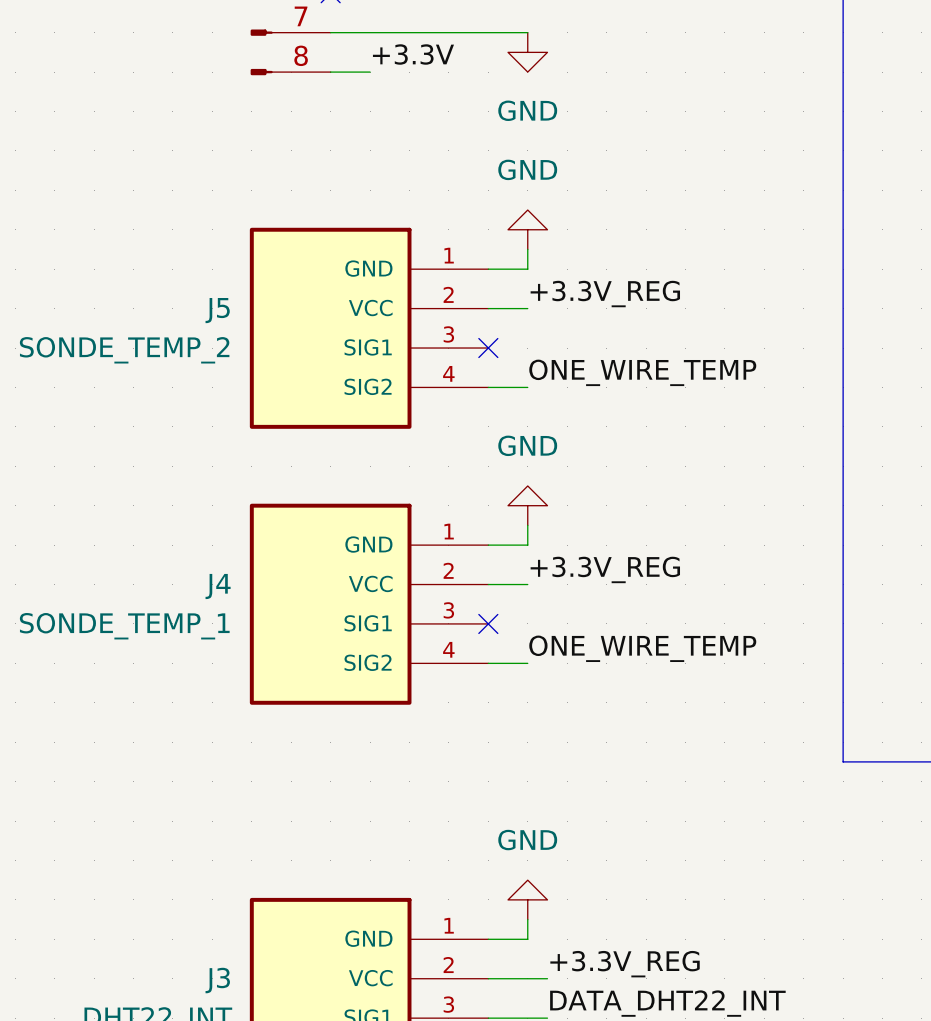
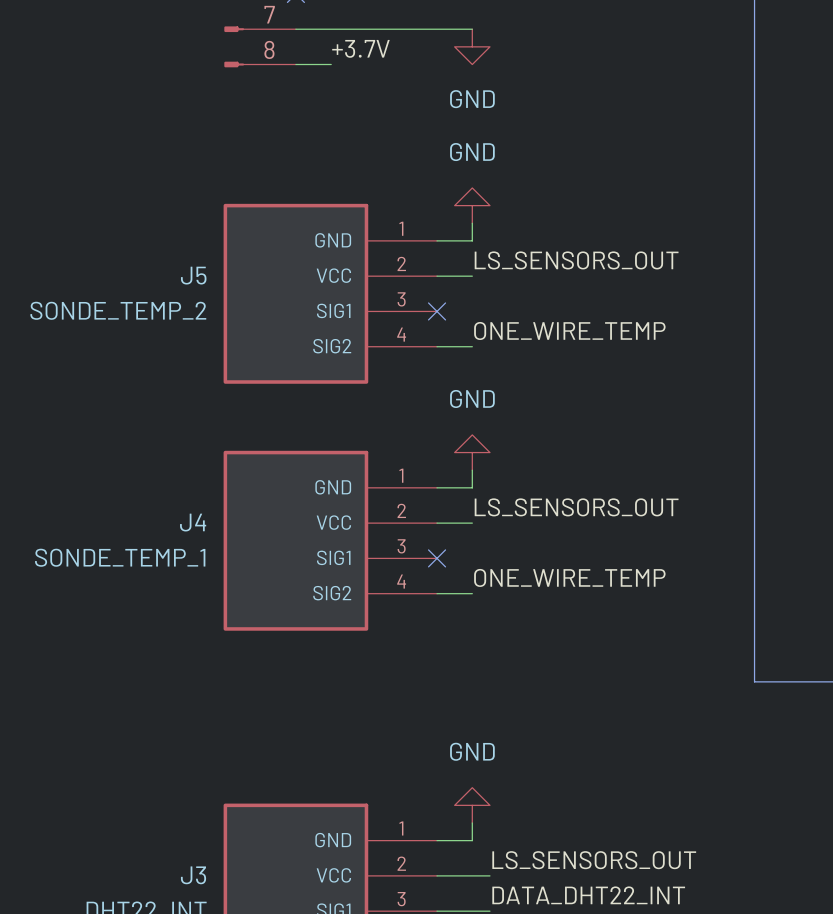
label: +3.3V (413, 54) -> +3.7V (360, 48)
label: +3.3V_REG (605, 294) -> LS_SENSORS_OUT (576, 260)
label: +3.3V_REG (605, 569) -> LS_SENSORS_OUT (576, 507)
label: +3.3V_REG (625, 964) -> LS_SENSORS_OUT (594, 860)

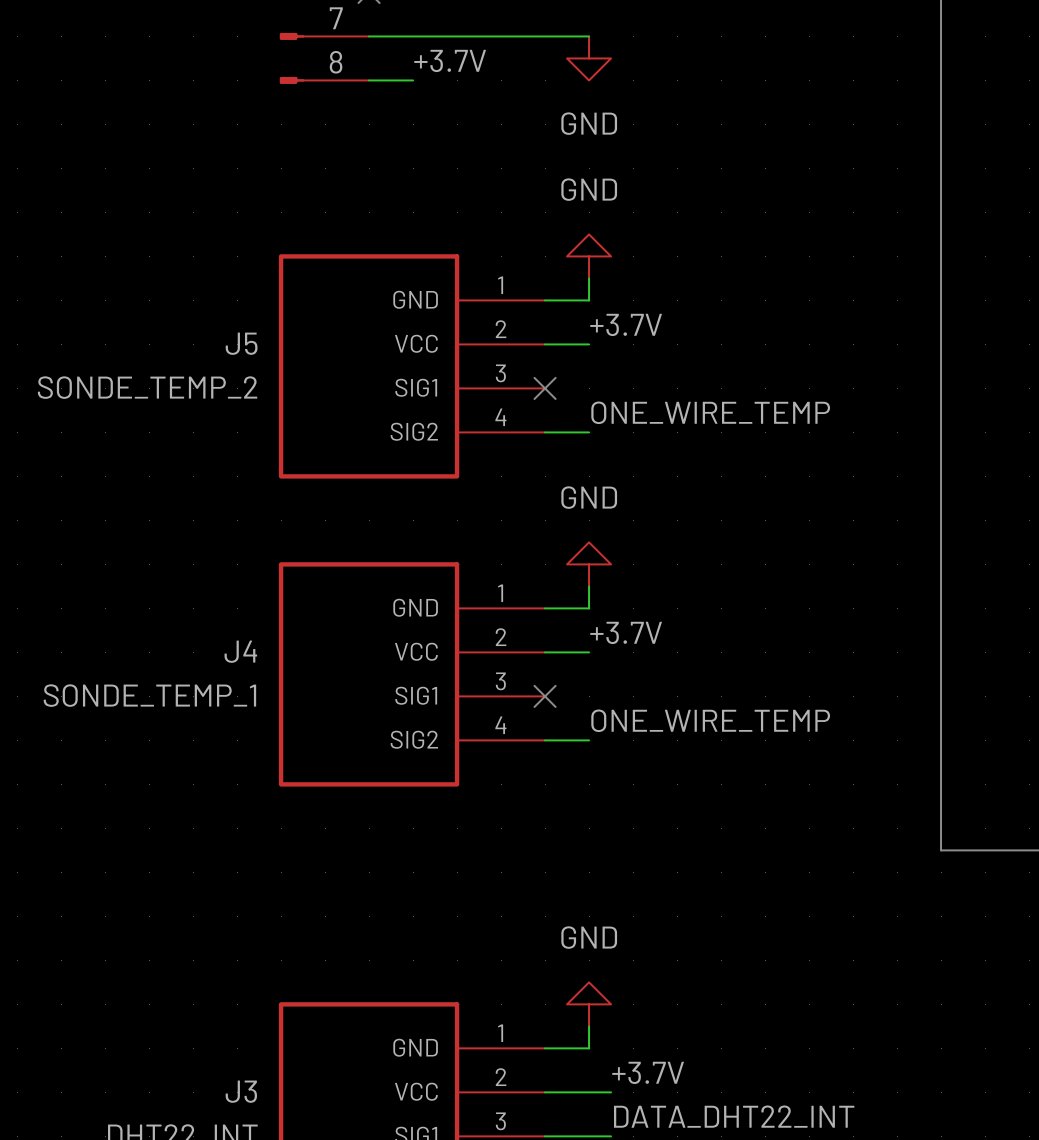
label: LS_SENSORS_OUT (576, 260) -> +3.7V (626, 324)
label: LS_SENSORS_OUT (576, 507) -> +3.7V (626, 632)
label: LS_SENSORS_OUT (594, 860) -> +3.7V (648, 1072)

